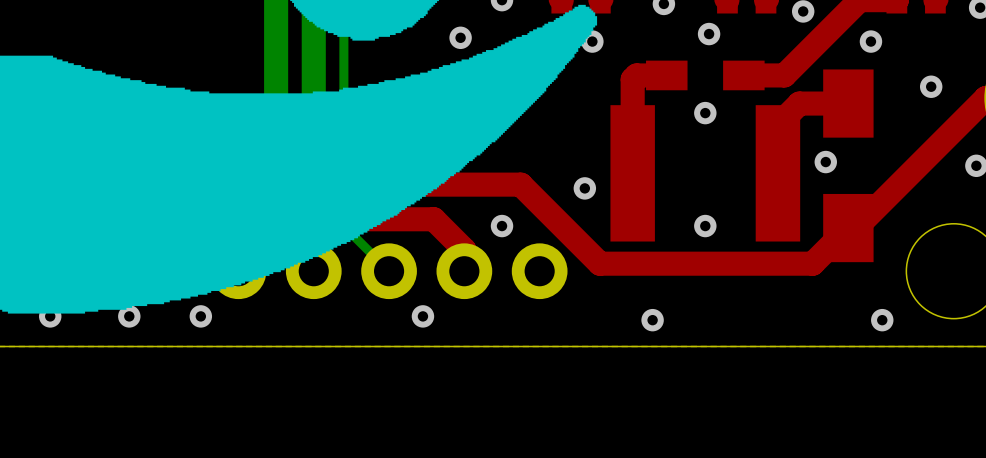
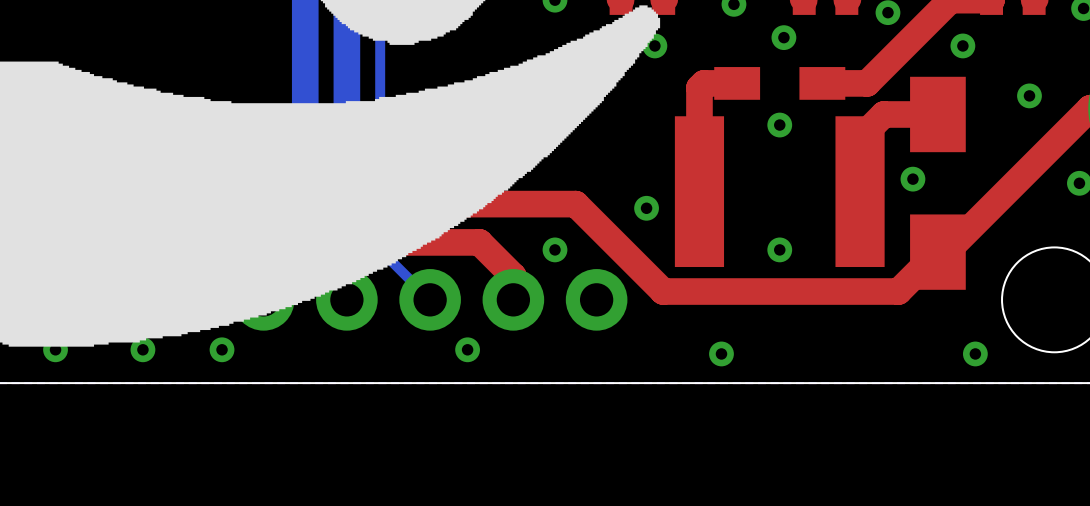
via: (460, 37) -> none

